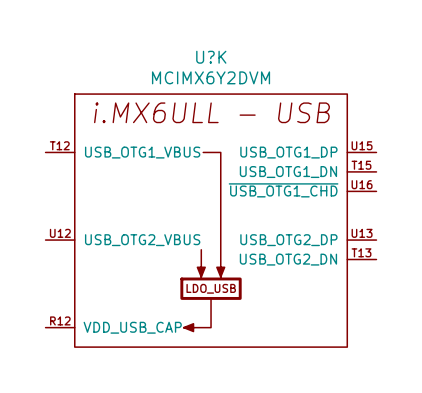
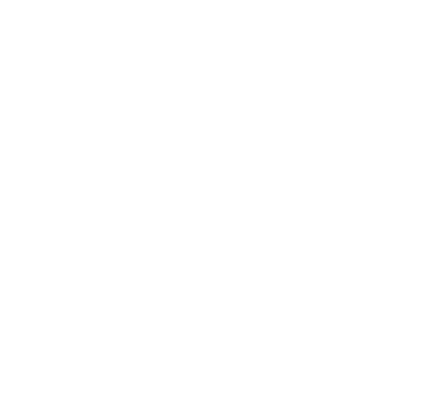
U?K: MCIMX6Y2DVM (211, 220) -> none

